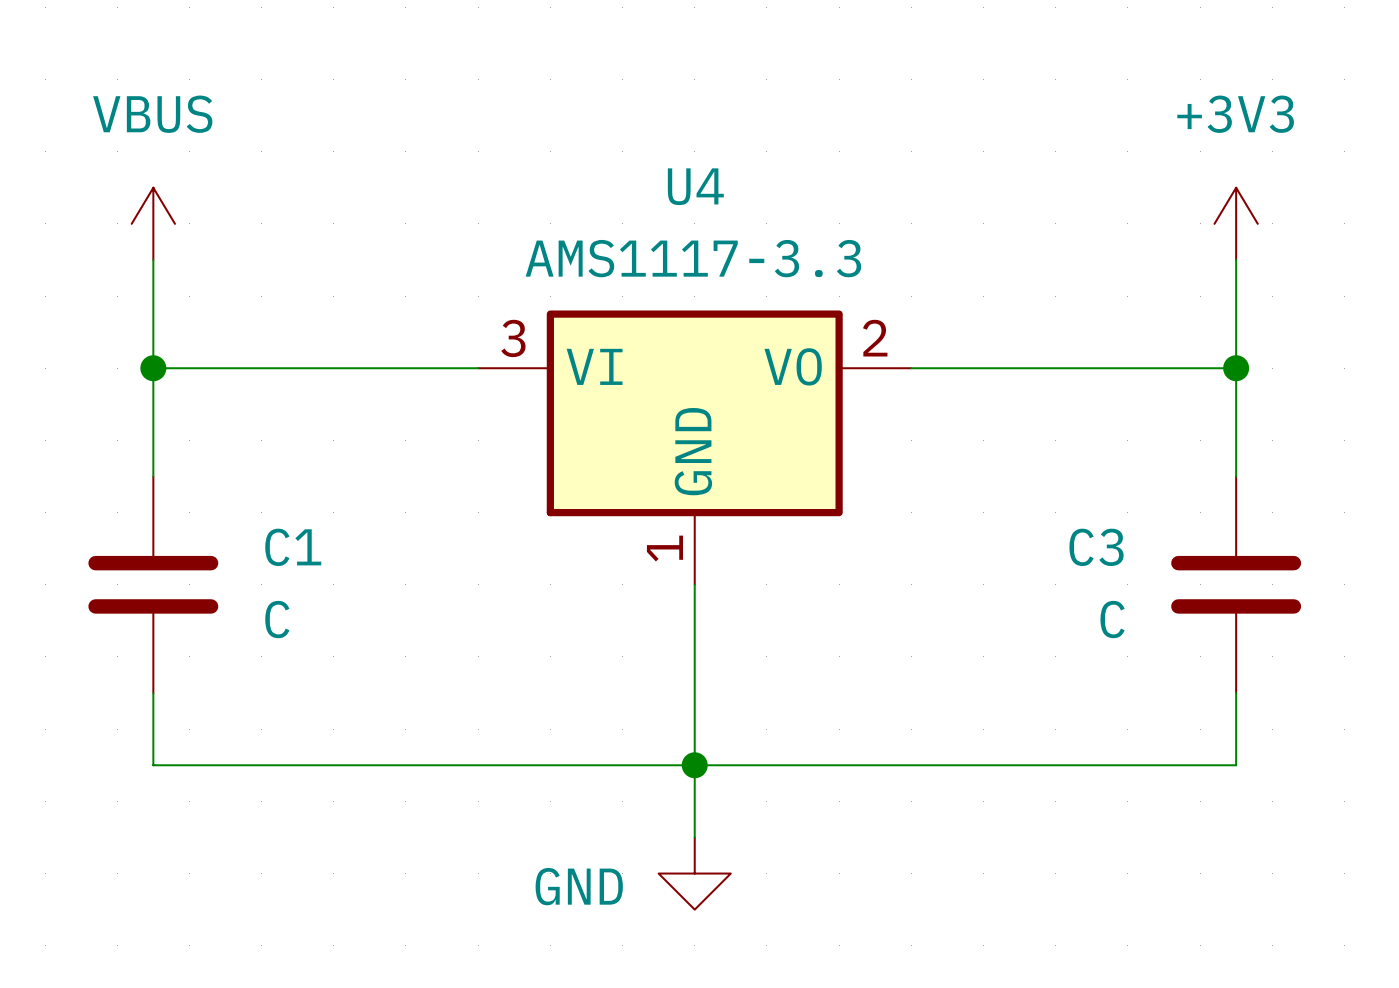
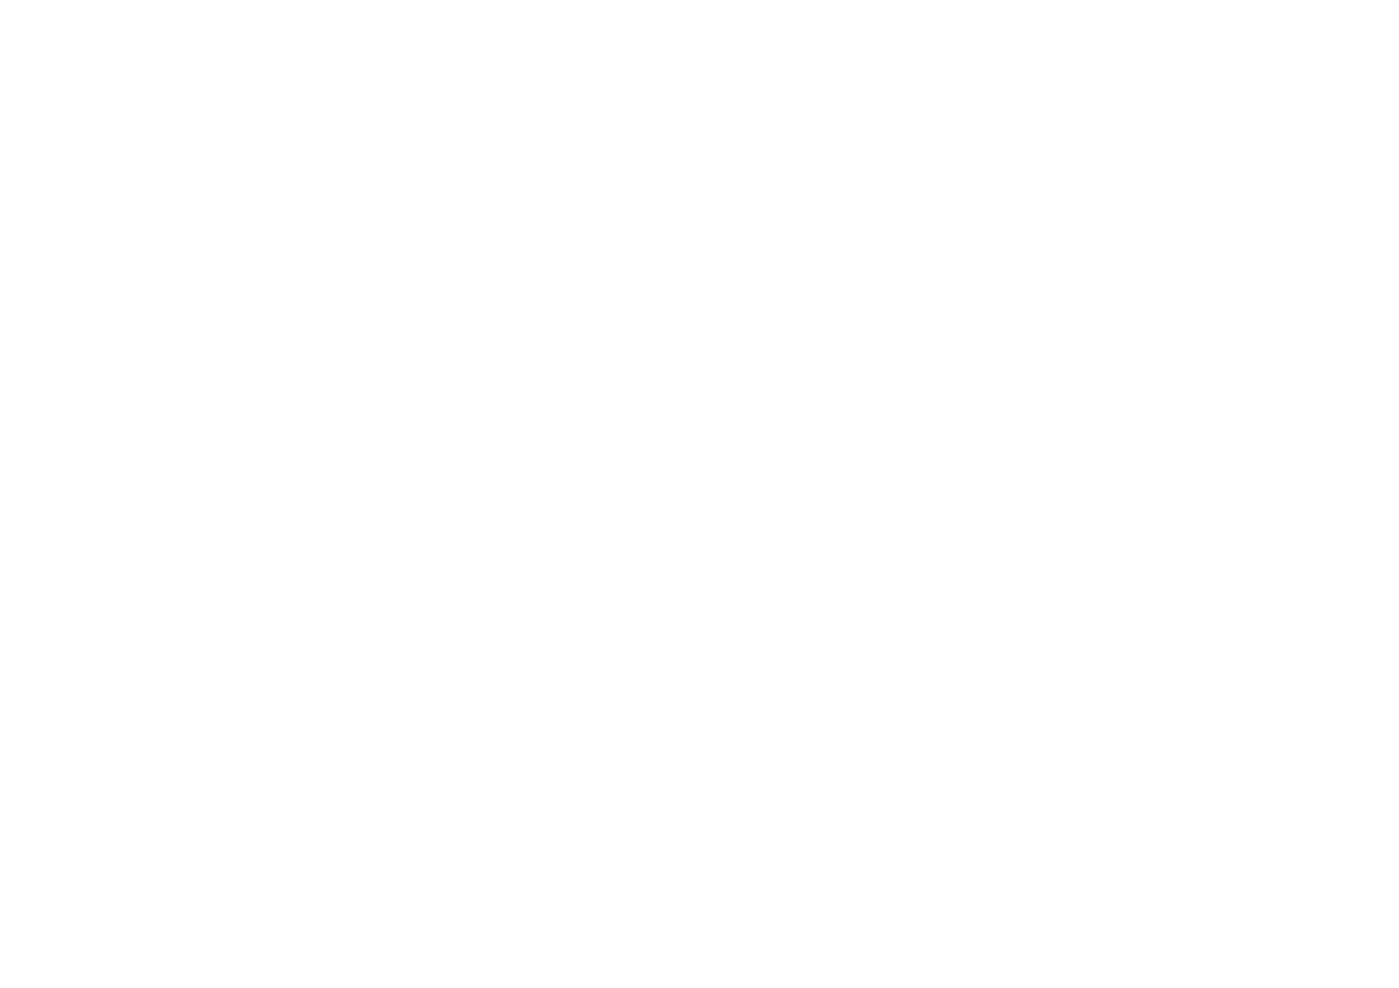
power symbol: VBUS (153, 223) -> none
power symbol: +3V3 (1236, 223) -> none
wire: (153, 259) (153, 476) -> none
wire: (1236, 259) (1236, 476) -> none
wire: (153, 368) (478, 368) -> none
junction: (153, 368) -> none
wire: (911, 368) (1236, 368) -> none
junction: (1236, 368) -> none
U4: AMS1117-3.3 (694, 447) -> none
C1: C (153, 584) -> none
wire: (694, 584) (694, 837) -> none
C3: C (1236, 584) -> none
wire: (153, 693) (153, 765) (1236, 765) (1236, 693) -> none
junction: (694, 765) -> none
power symbol: GND (694, 873) -> none

